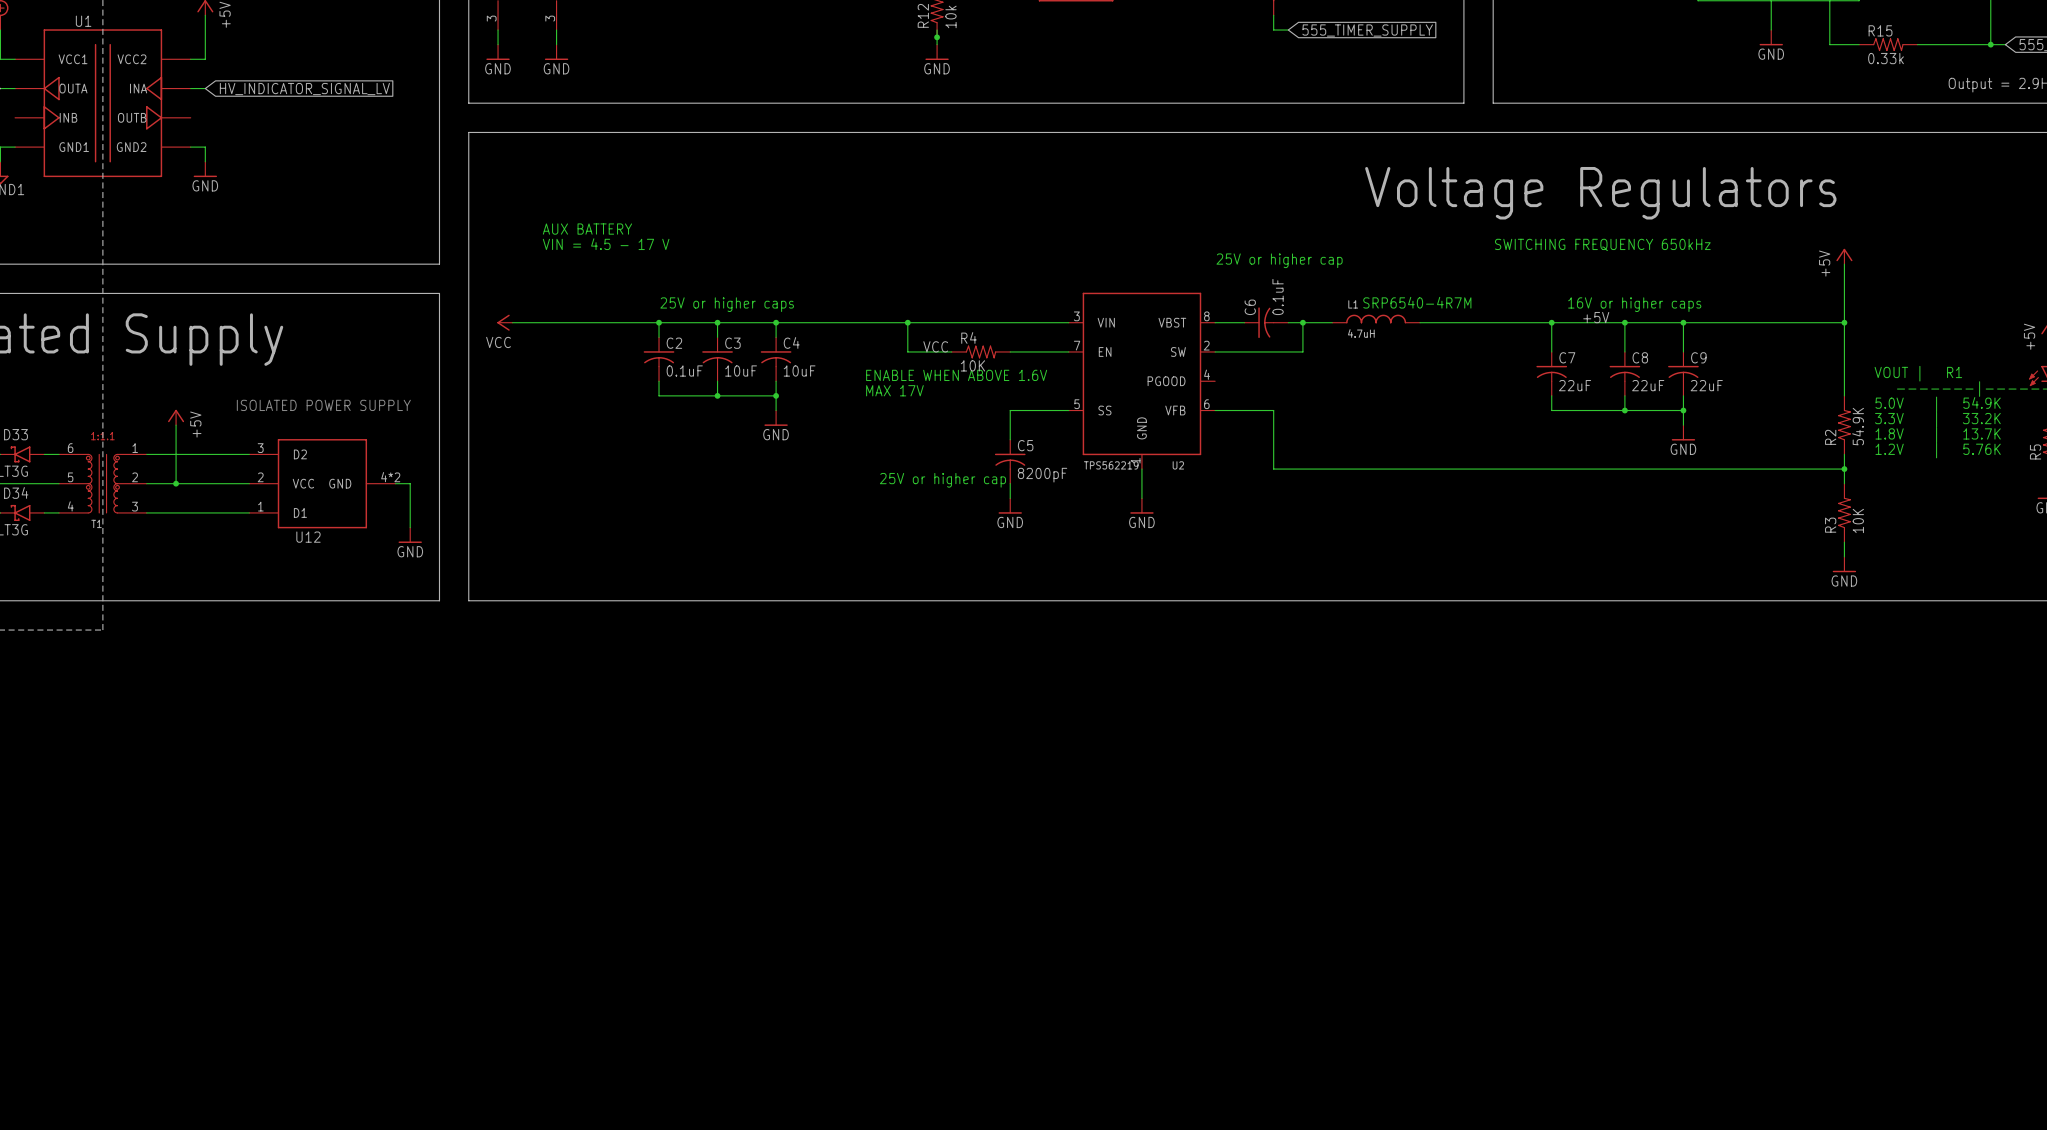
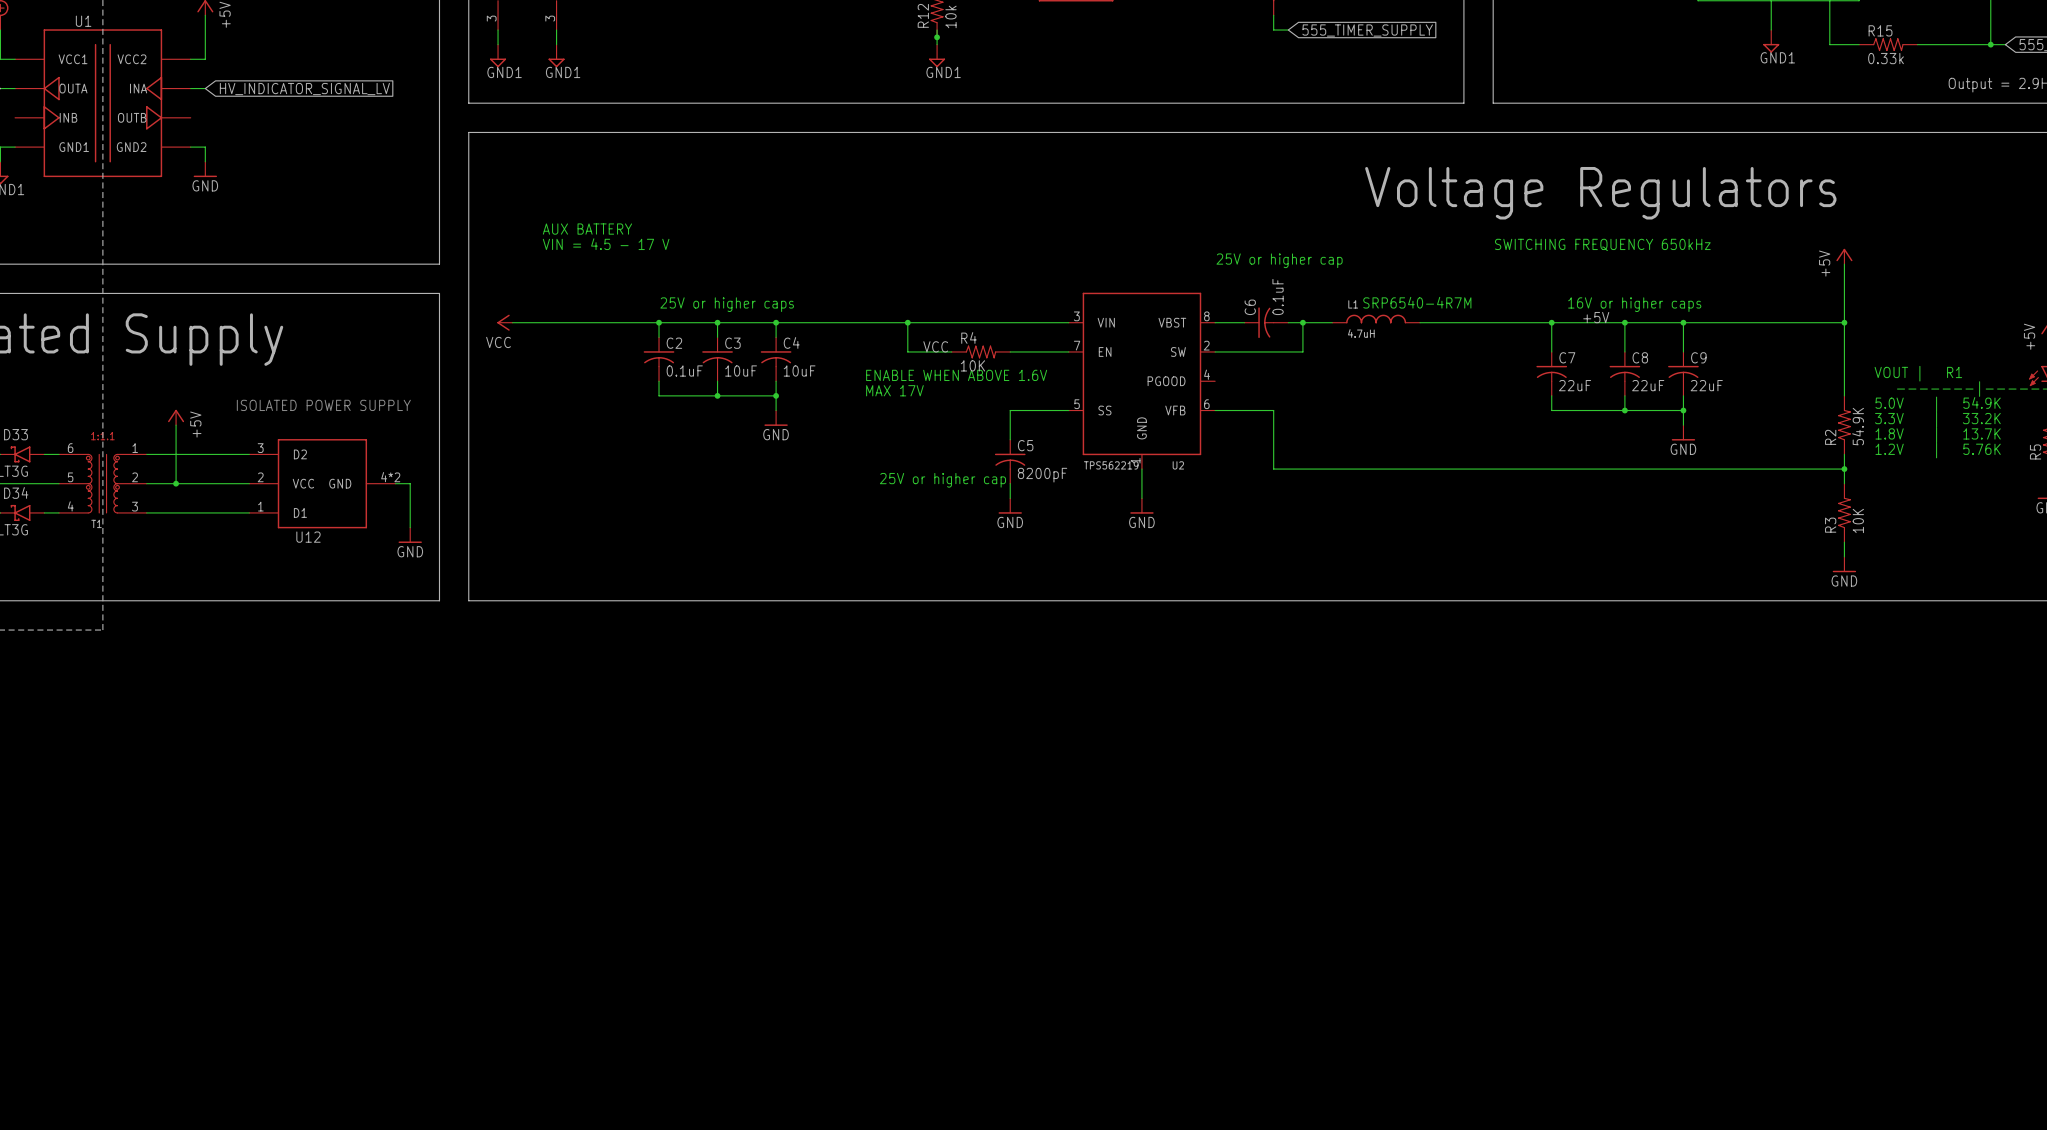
power symbol: GND (1771, 37) -> GND1 (1771, 41)
power symbol: GND (498, 52) -> GND1 (498, 55)
power symbol: GND (556, 52) -> GND1 (556, 55)
power symbol: GND (937, 52) -> GND1 (937, 55)

